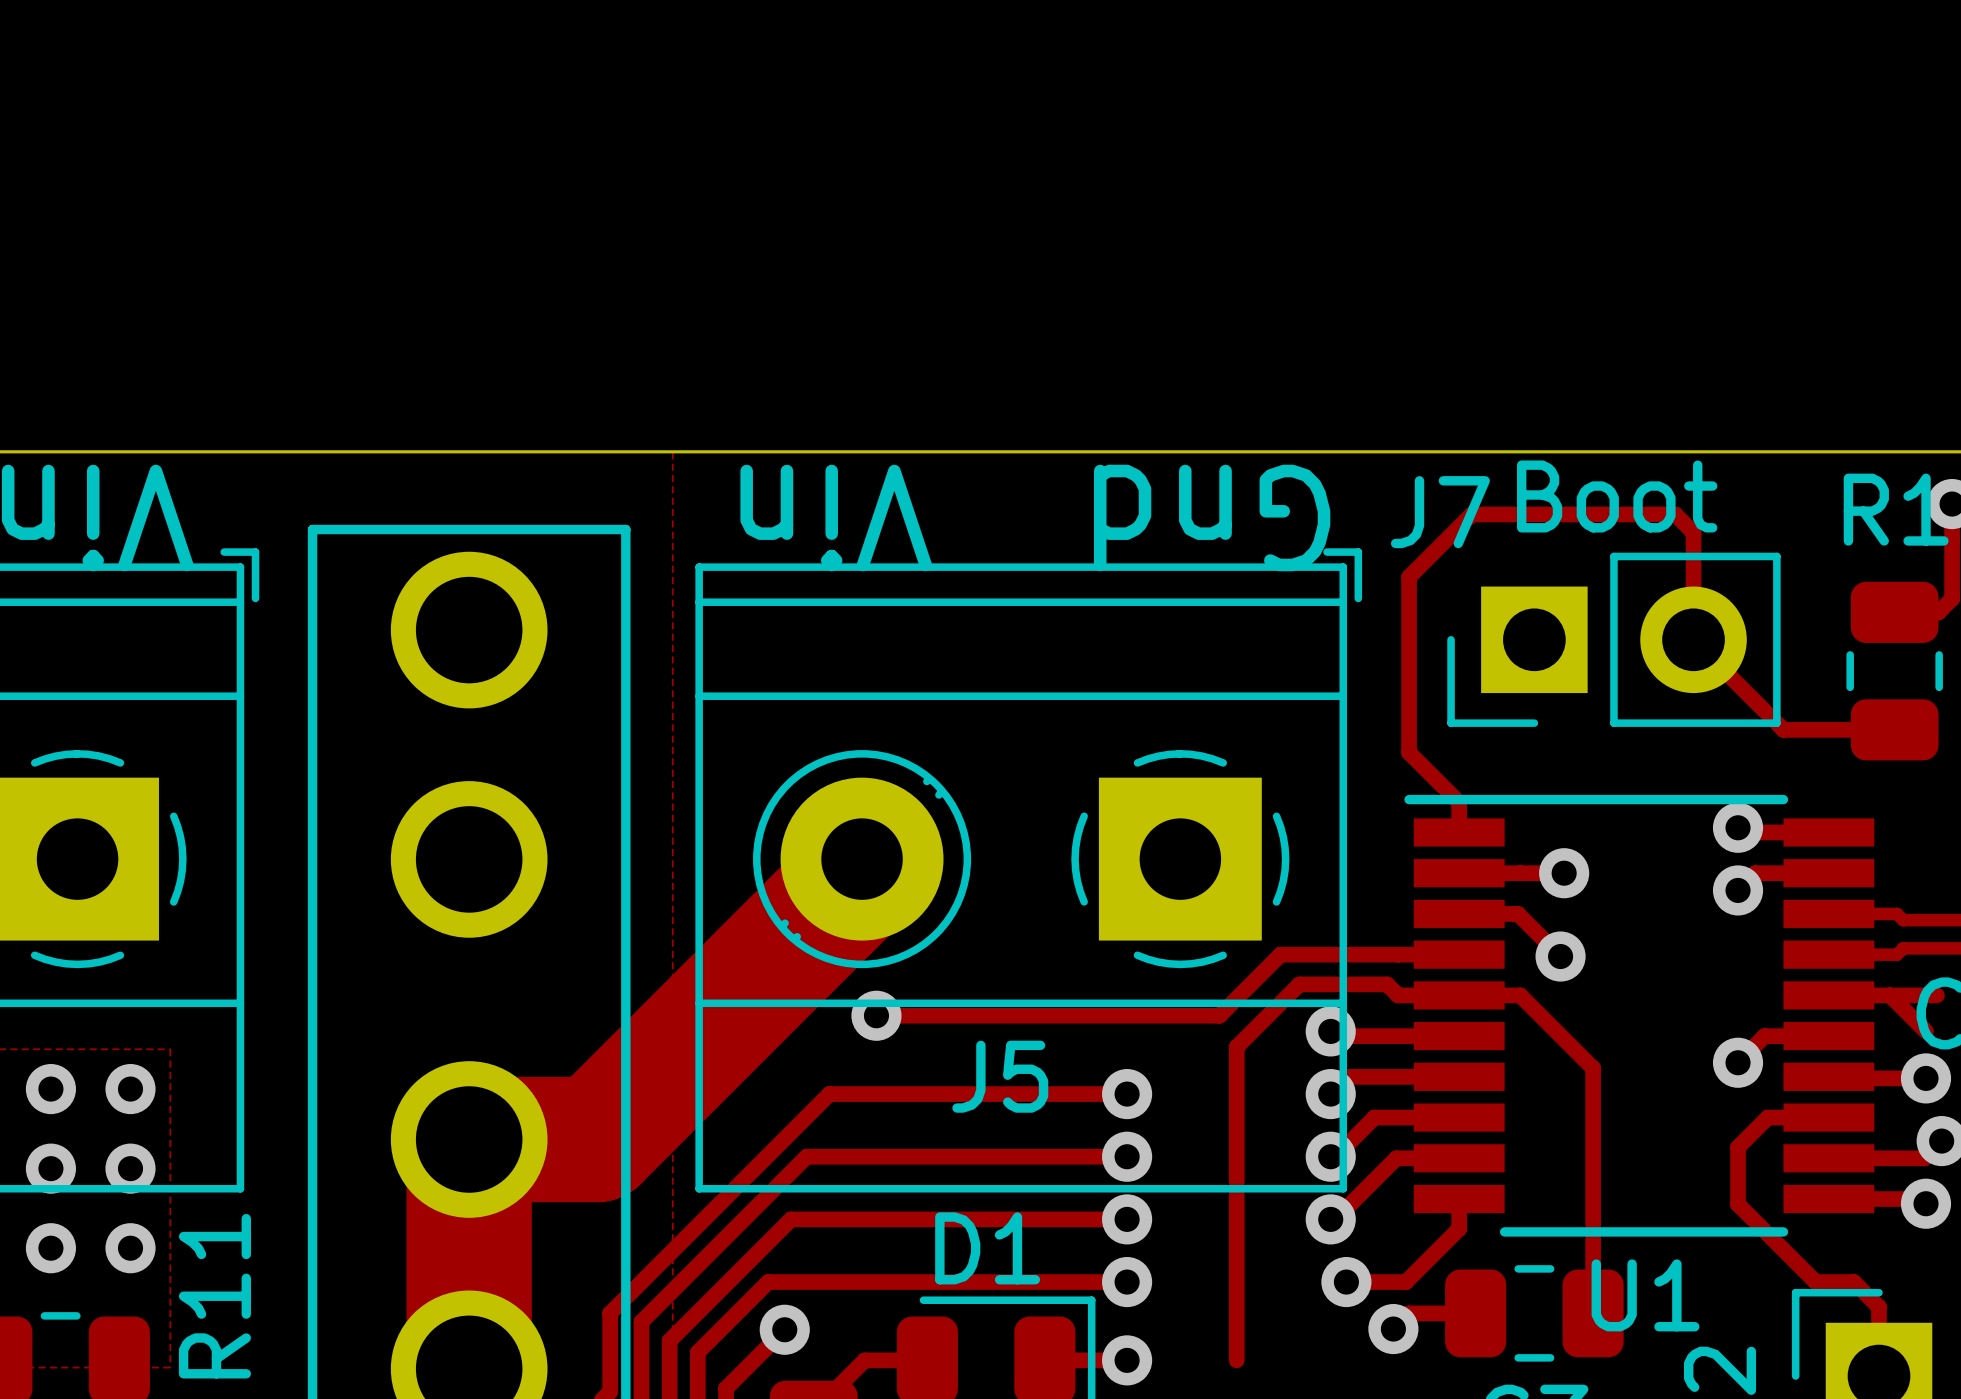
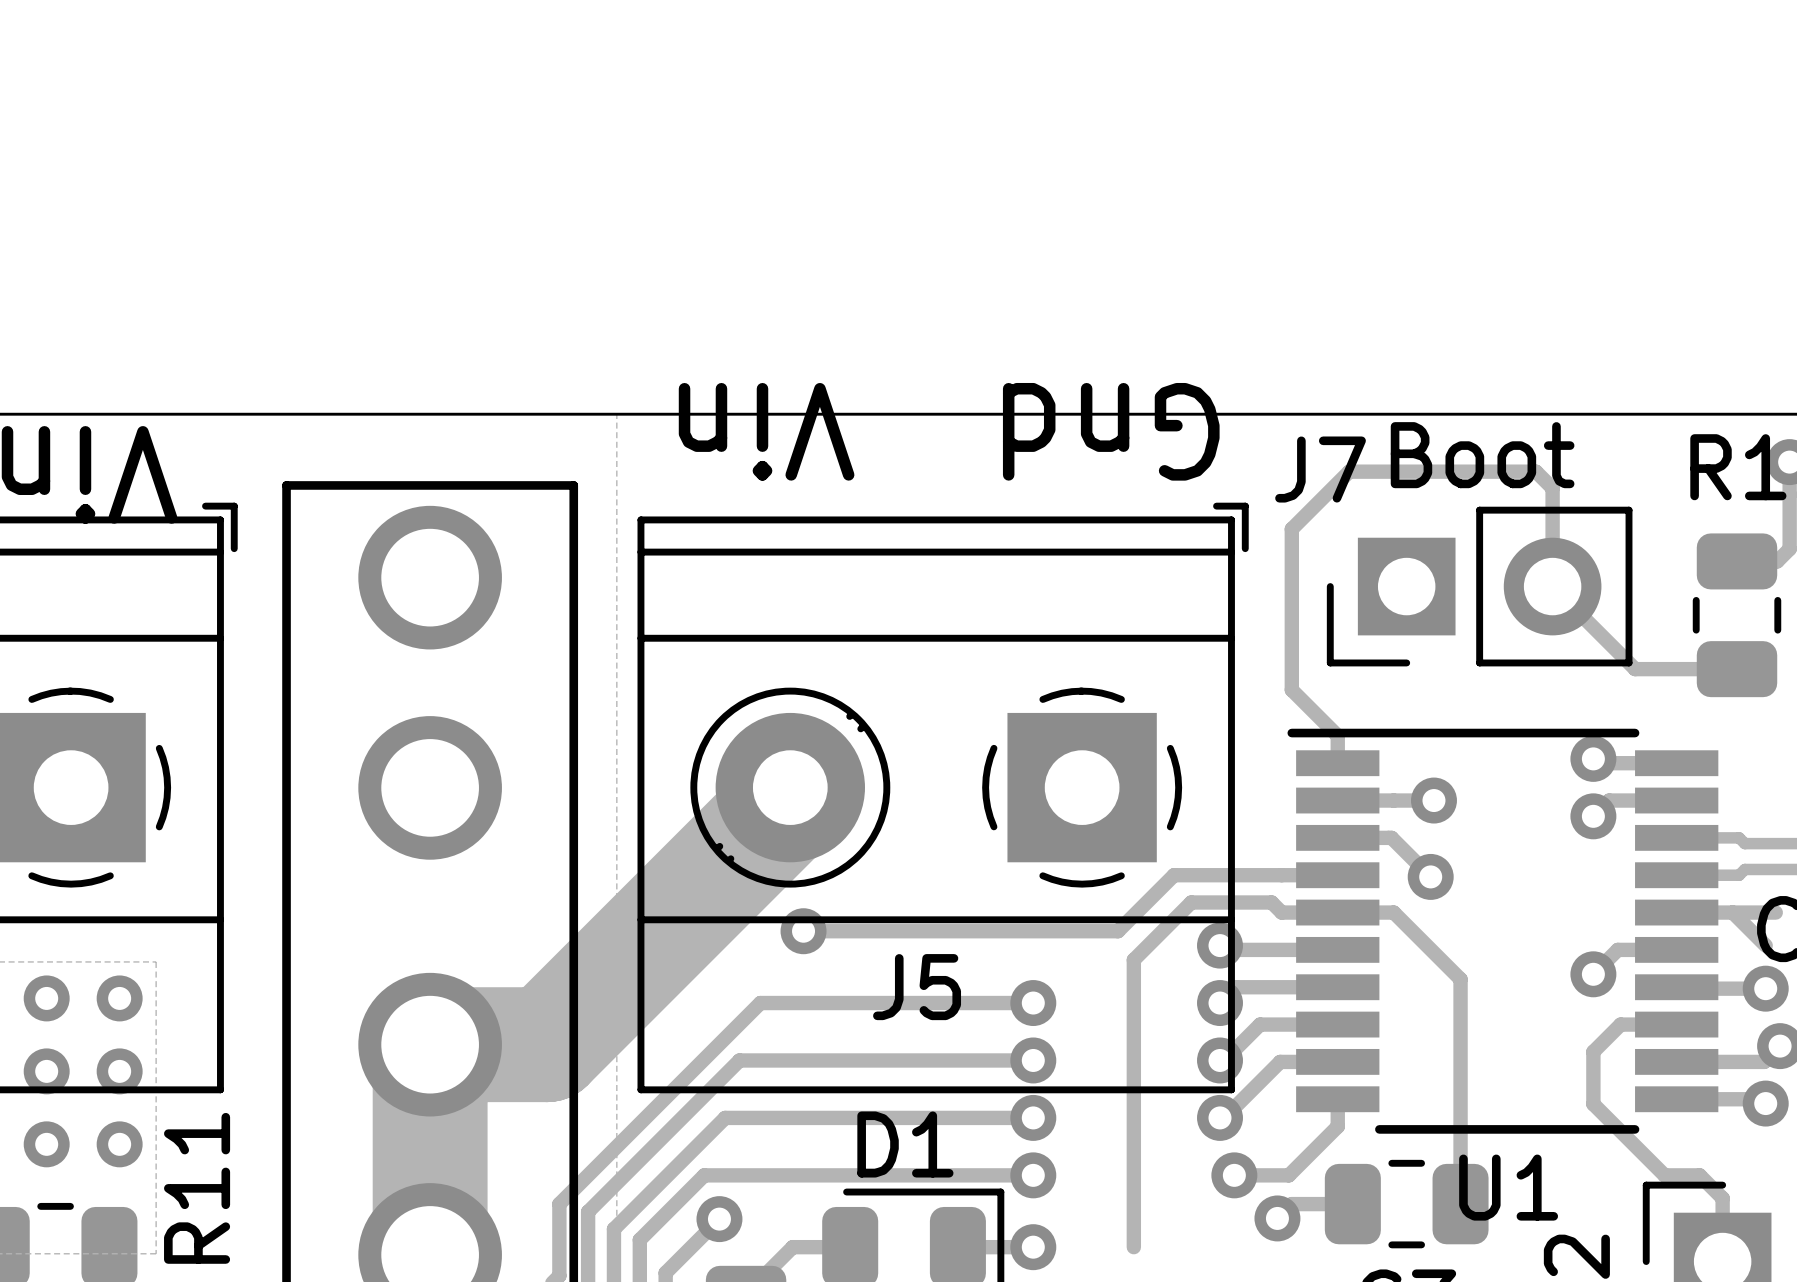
text position: Gnd Vin (1035, 517) -> Gnd Vin (949, 431)

